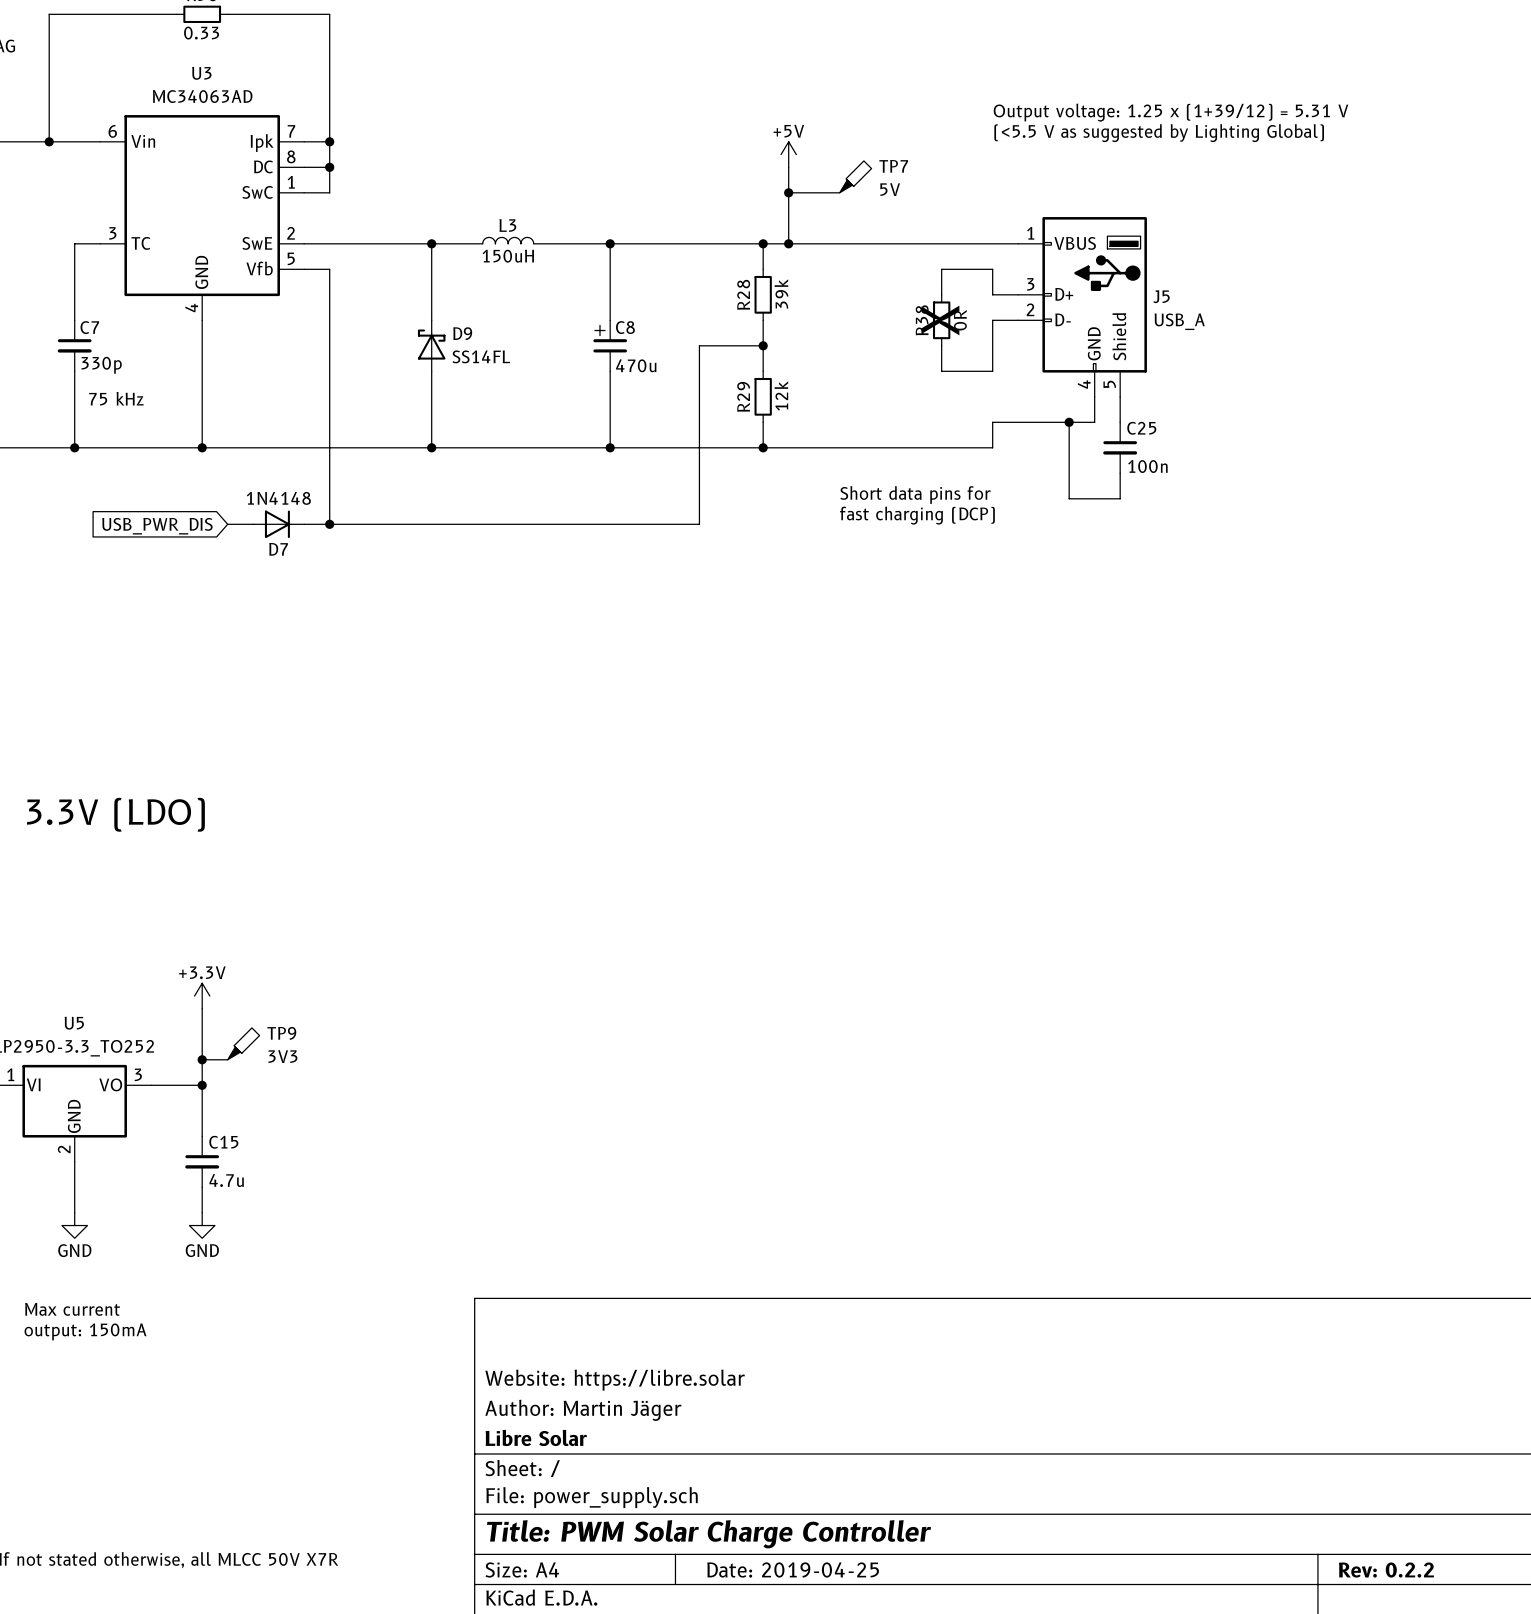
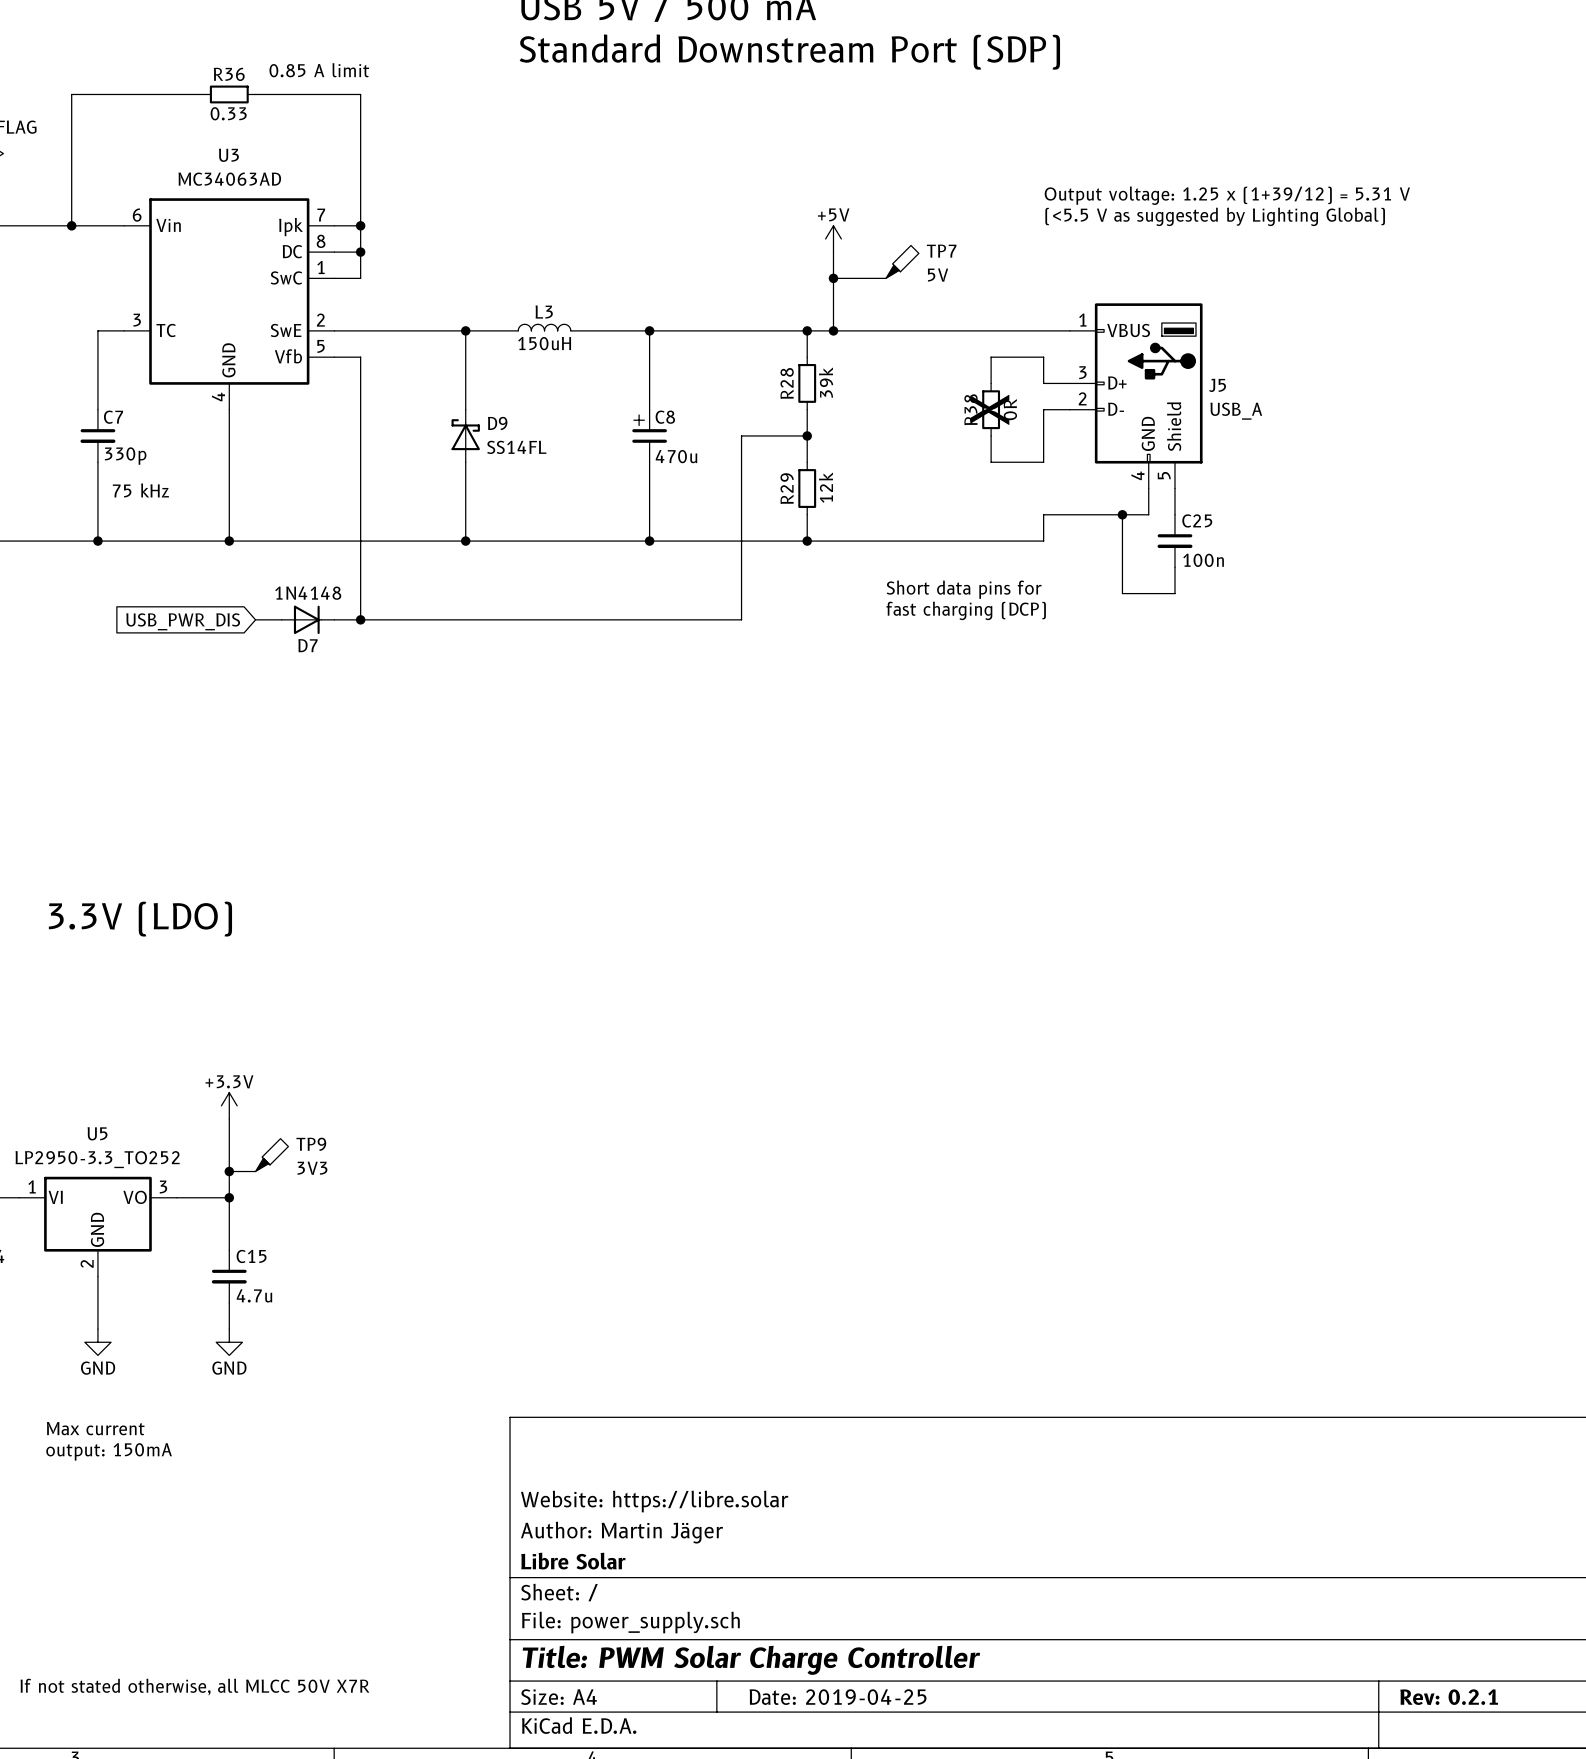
title block: Rev: 0.2.2 (1386, 1570) -> Rev: 0.2.1 (1449, 1697)

